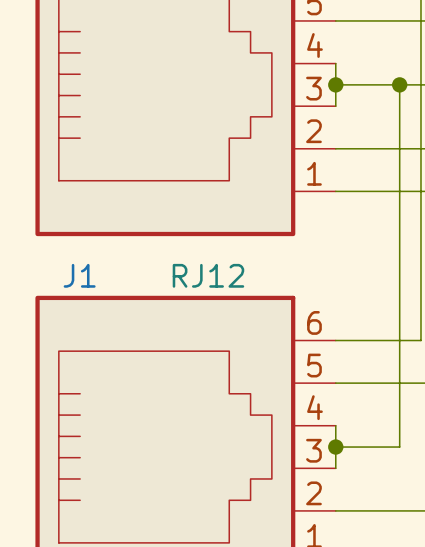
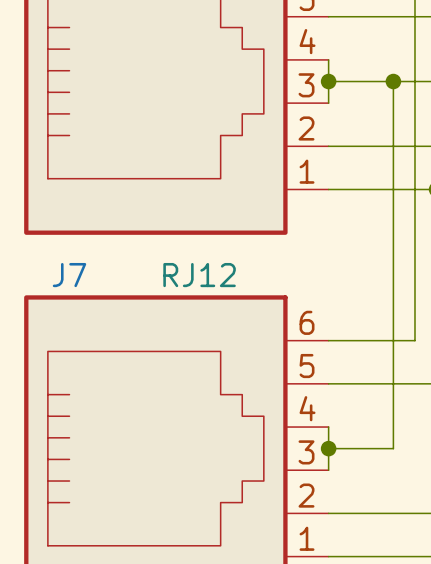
J1 name: J1 (79, 275) -> J7 (69, 275)

